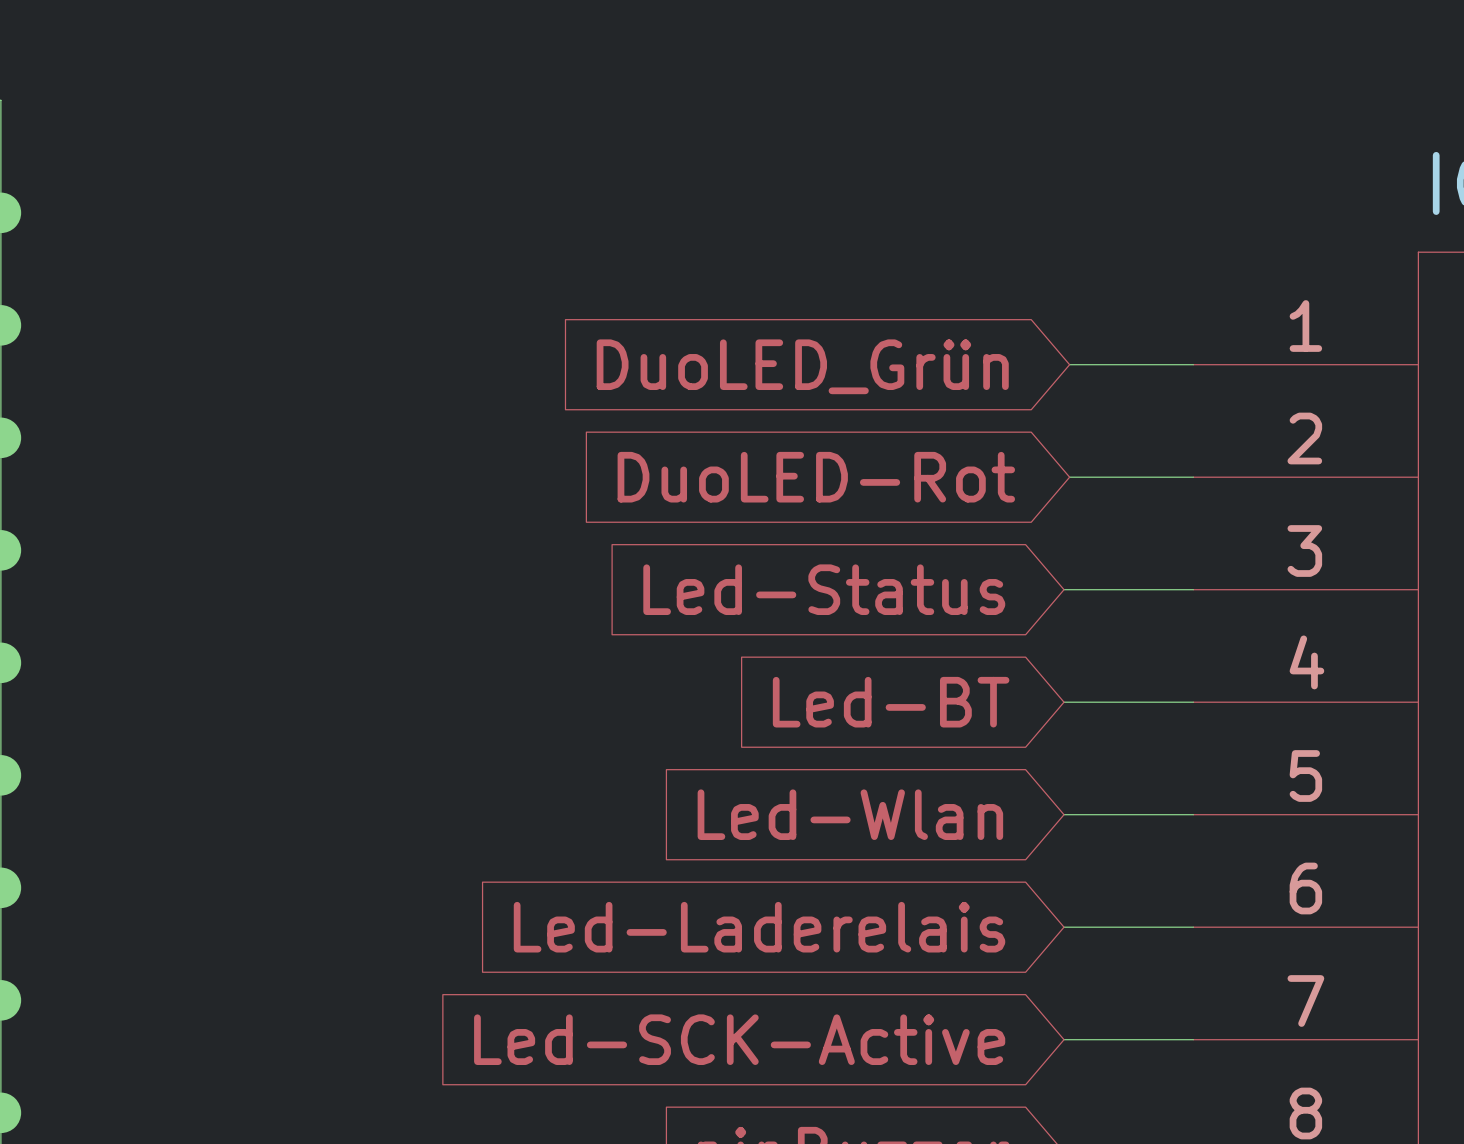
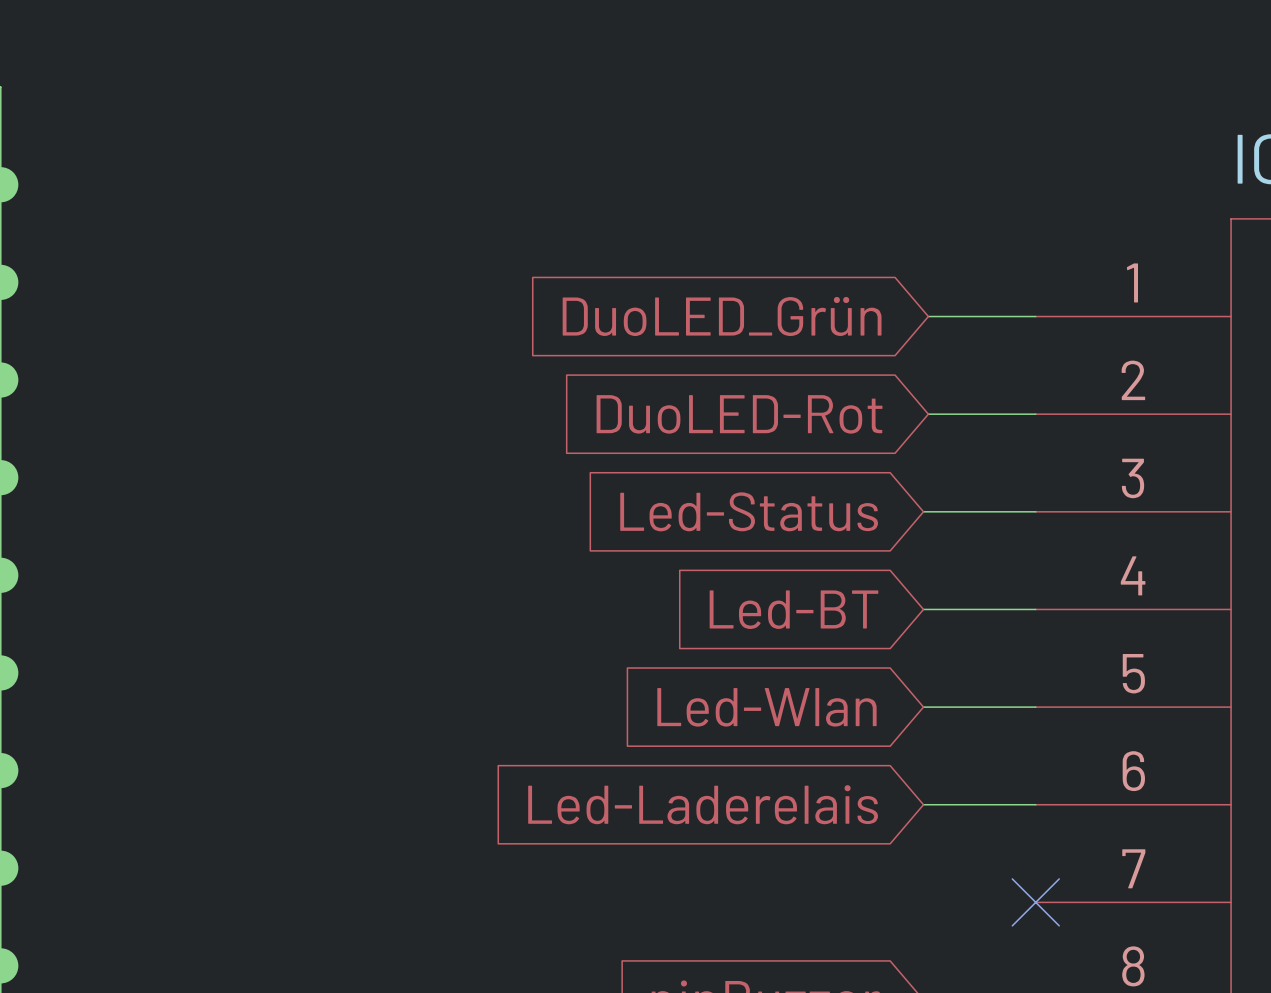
global label: Led-SCK-Active (739, 1039) -> none
wire: (1064, 1039) (1193, 1039) -> none
no-connect mark: none -> (1035, 902)

